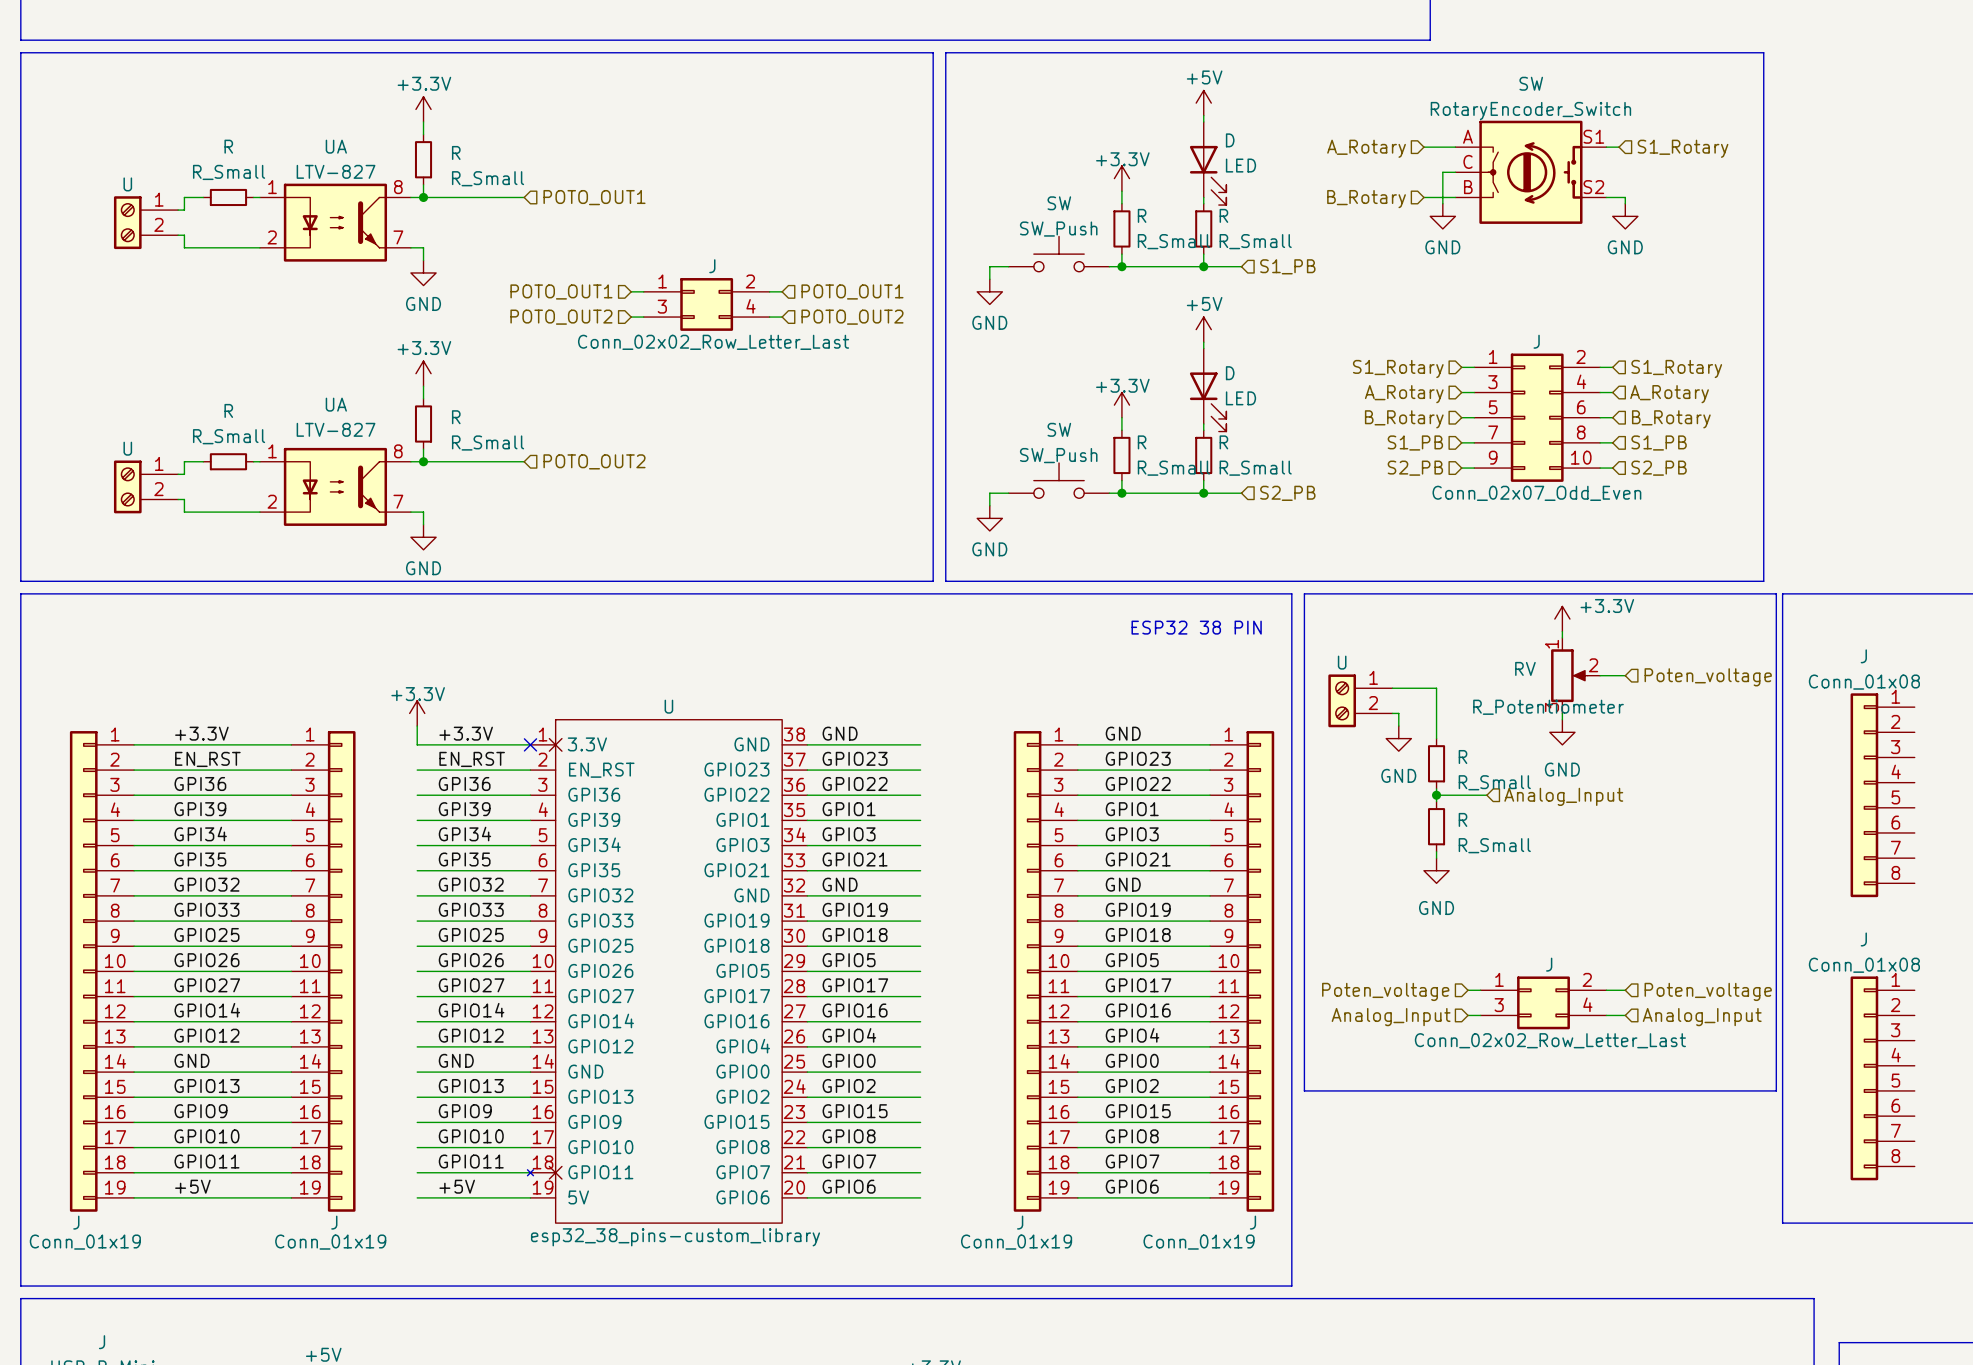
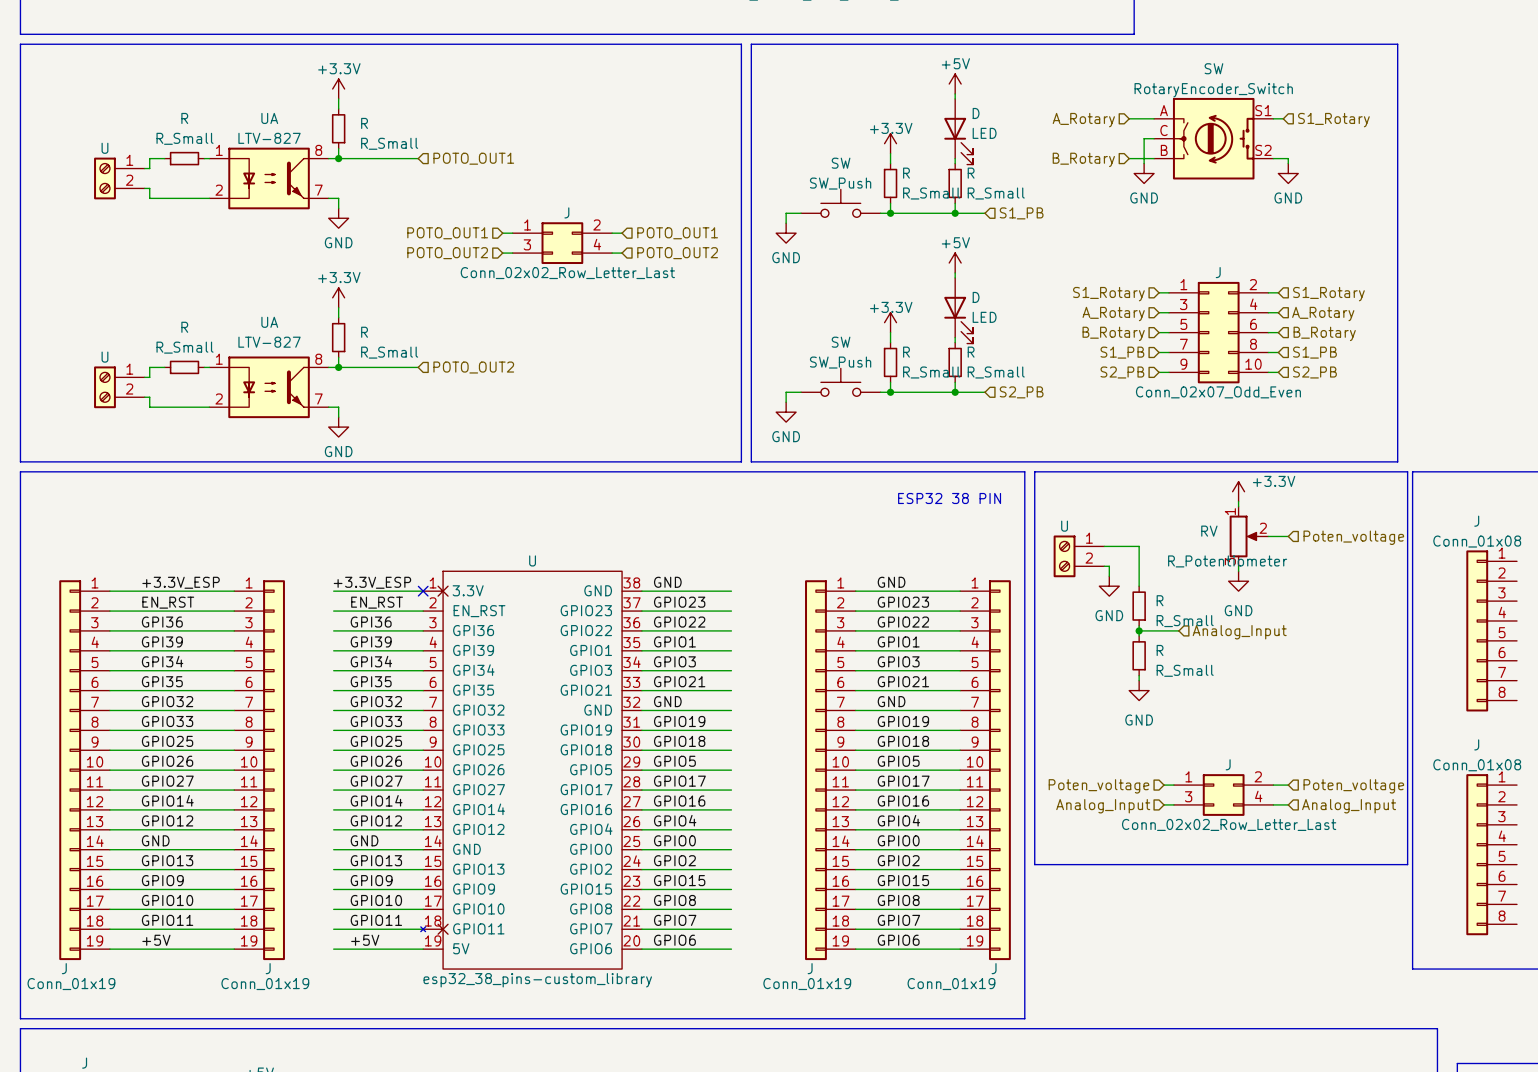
power symbol: +3.3V (417, 713) -> none
wire: (417, 726) (417, 744) -> none
label: +3.3V (201, 733) -> +3.3V_ESP (181, 582)
label: +3.3V (466, 733) -> +3.3V_ESP (372, 582)

